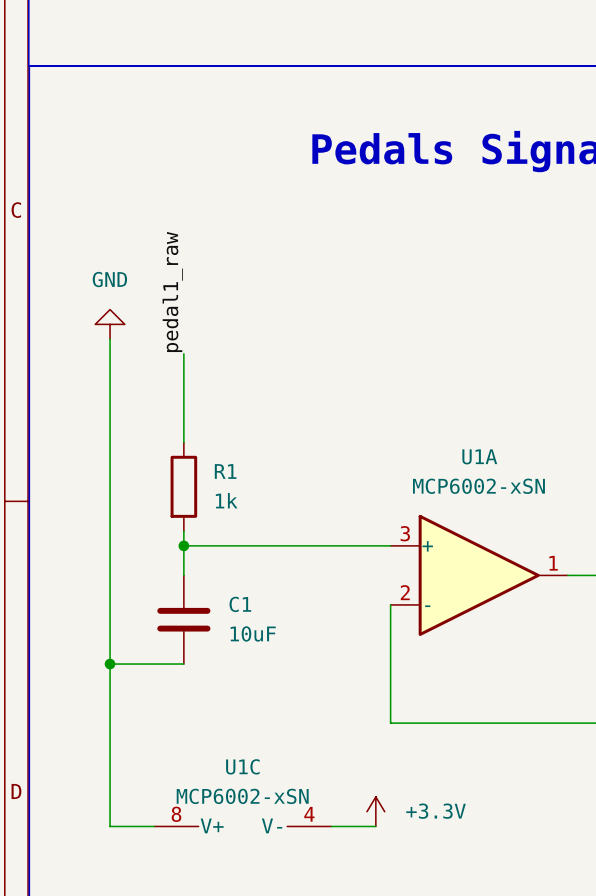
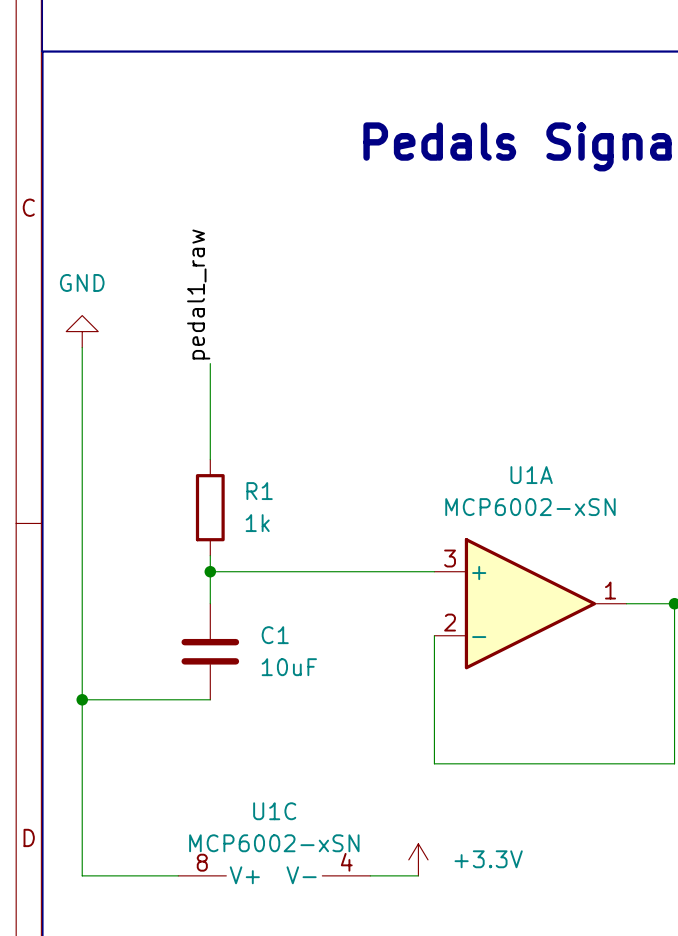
power symbol position: GND (110, 324) -> GND (82, 331)
wire: (110, 339) (110, 826) -> (82, 347) (82, 875) (130, 875)
wire: none -> (82, 699) (130, 699)
junction position: (110, 664) -> (82, 699)

